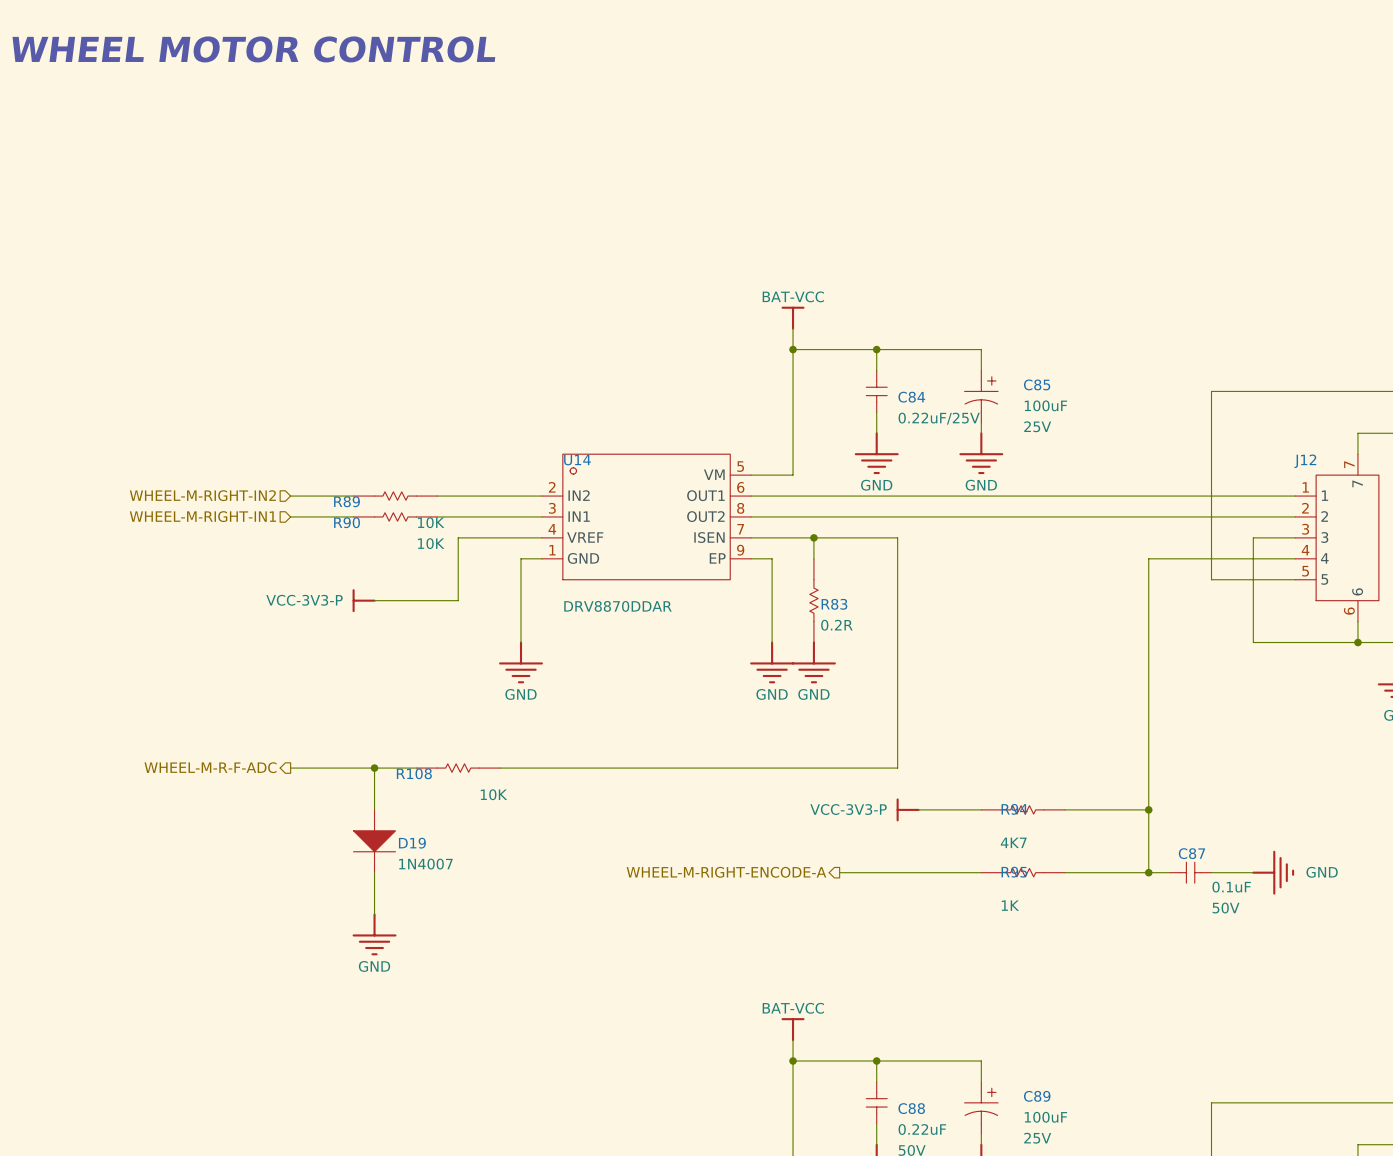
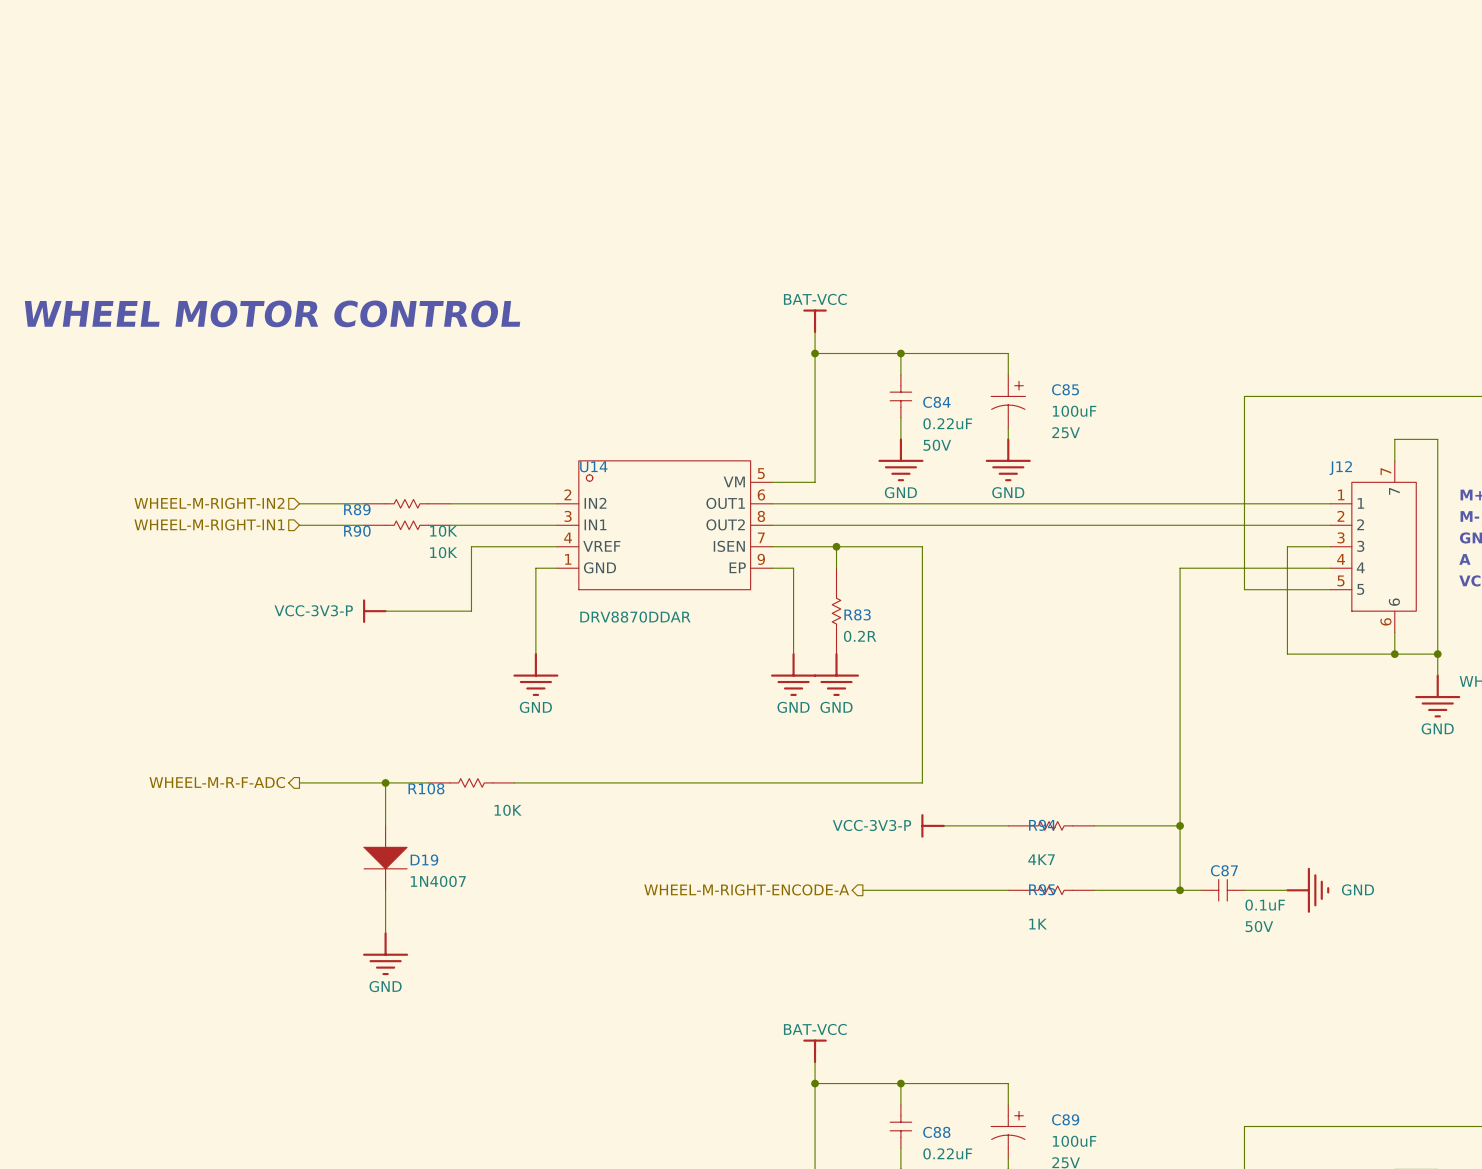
text: WHEEL MOTOR CONTROL (253, 49) -> none
text: none -> WHEEL MOTOR CONTROL (272, 313)
C84 value: 0.22uF/25V (939, 418) -> 0.22uF (947, 423)
C84 text: none -> 50V (937, 445)

